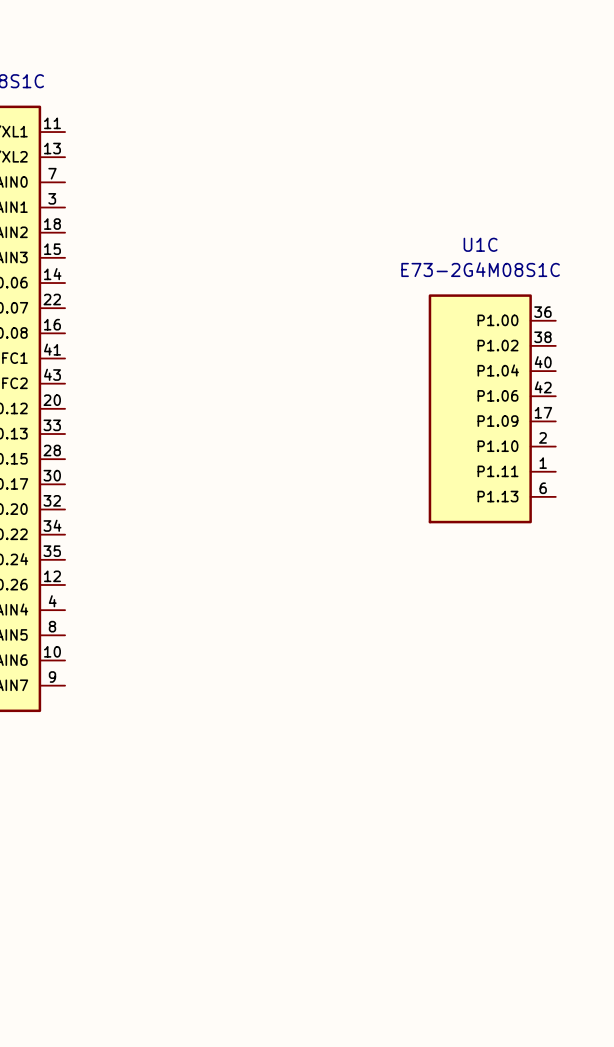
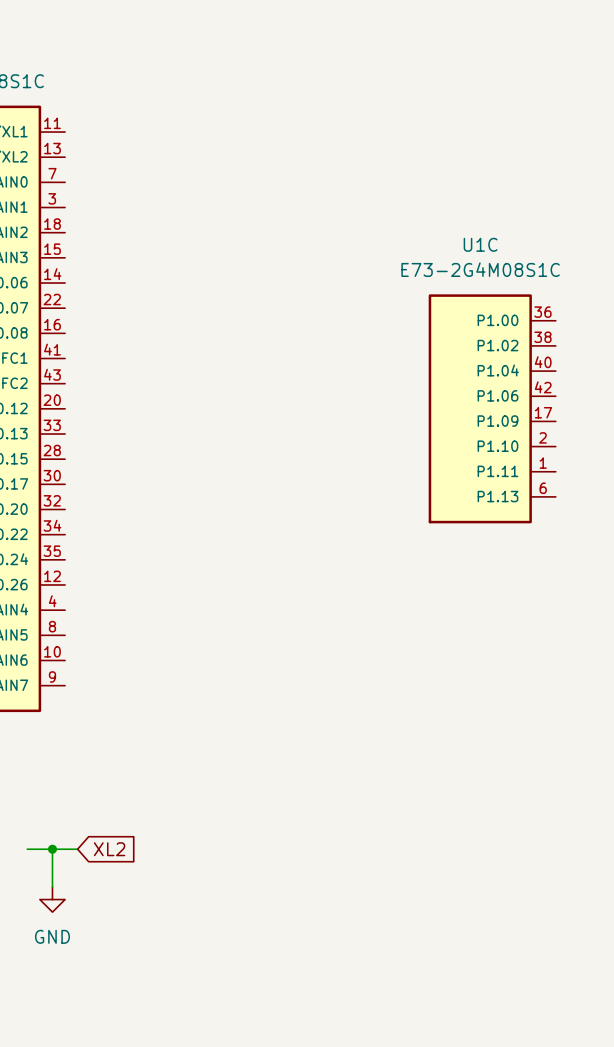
wire: none -> (27, 849) (77, 849)
wire: none -> (52, 849) (52, 886)
junction: none -> (52, 849)
global label: none -> XL2 (109, 849)
power symbol: none -> GND (52, 899)

